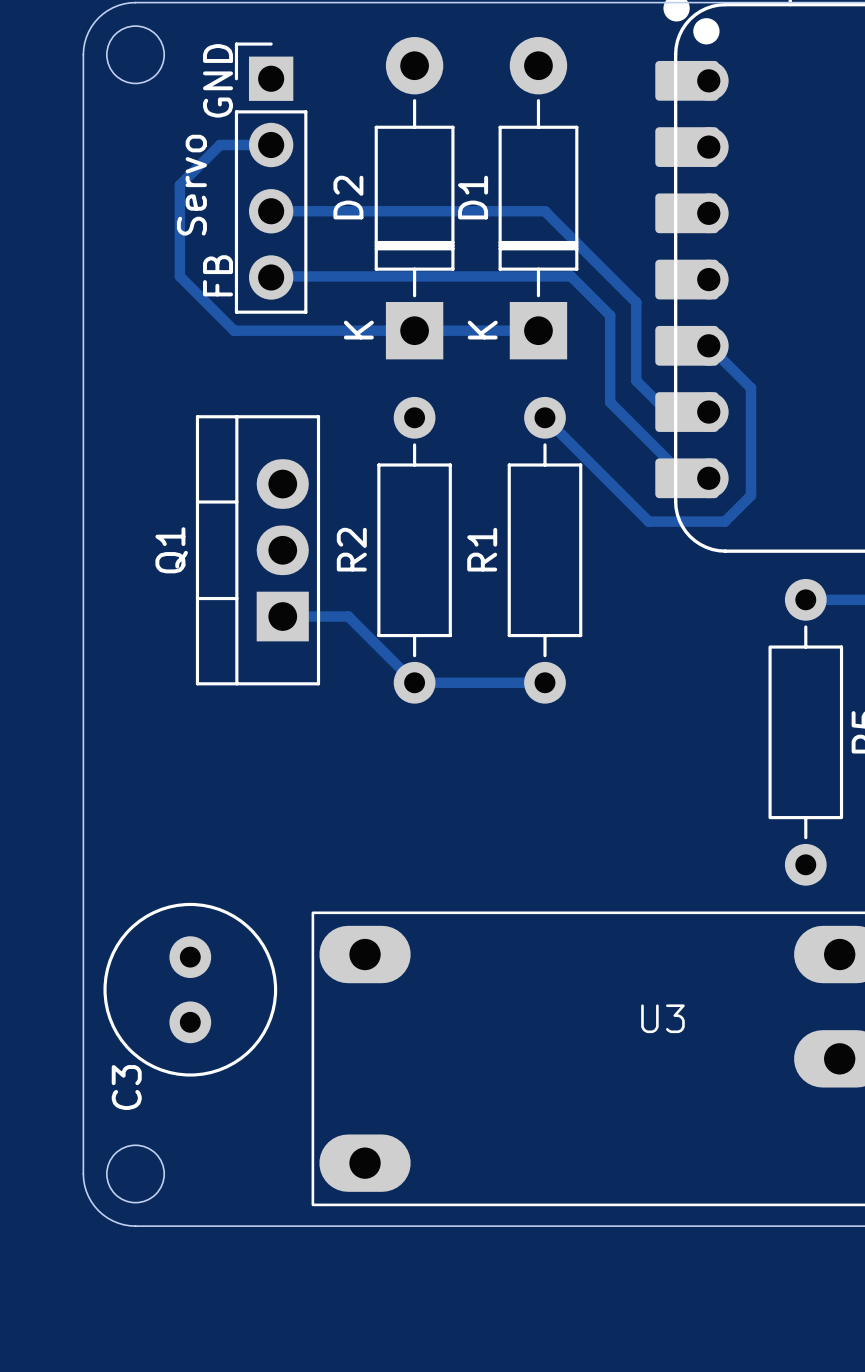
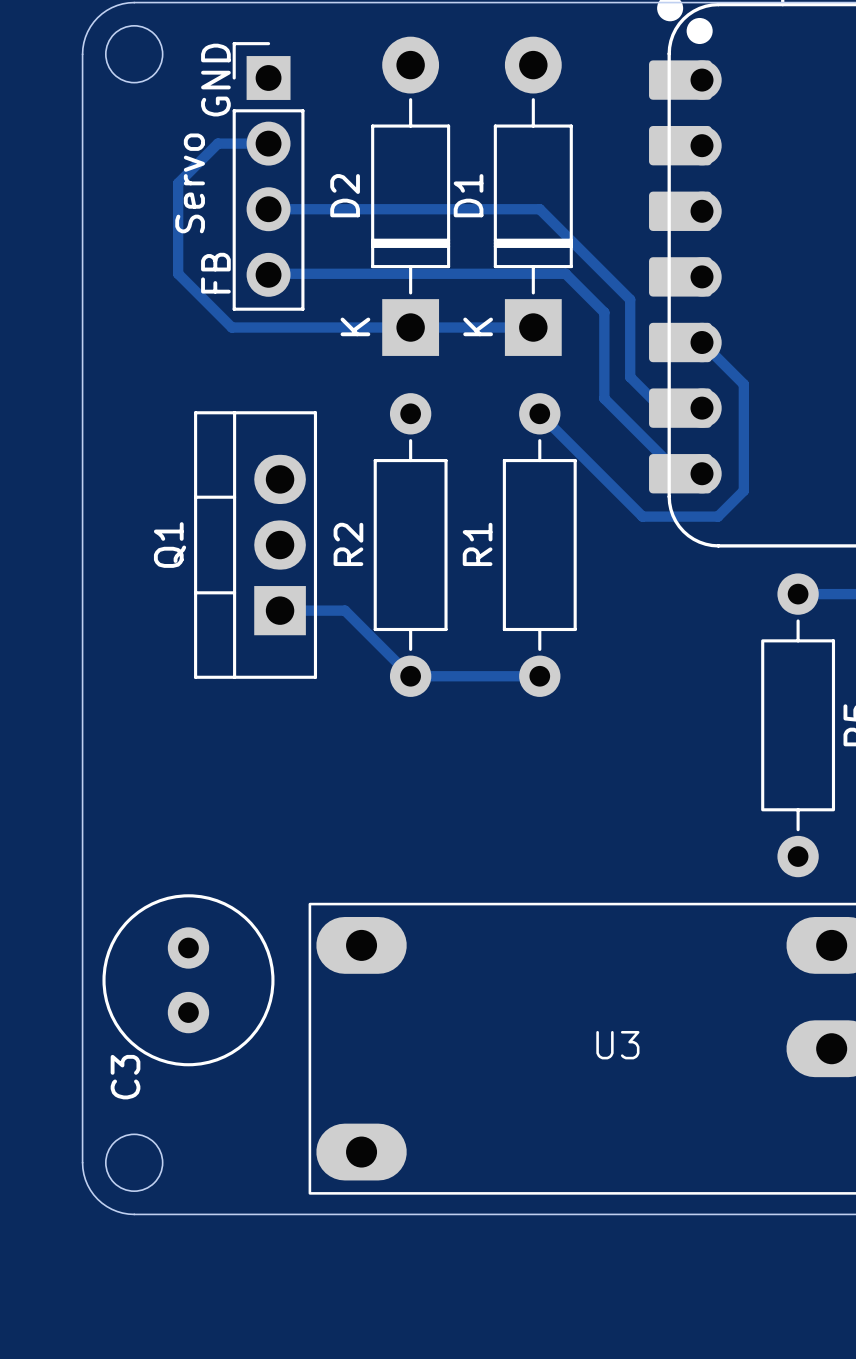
U3 name position: U3 (662, 1018) -> U3 (617, 1045)

